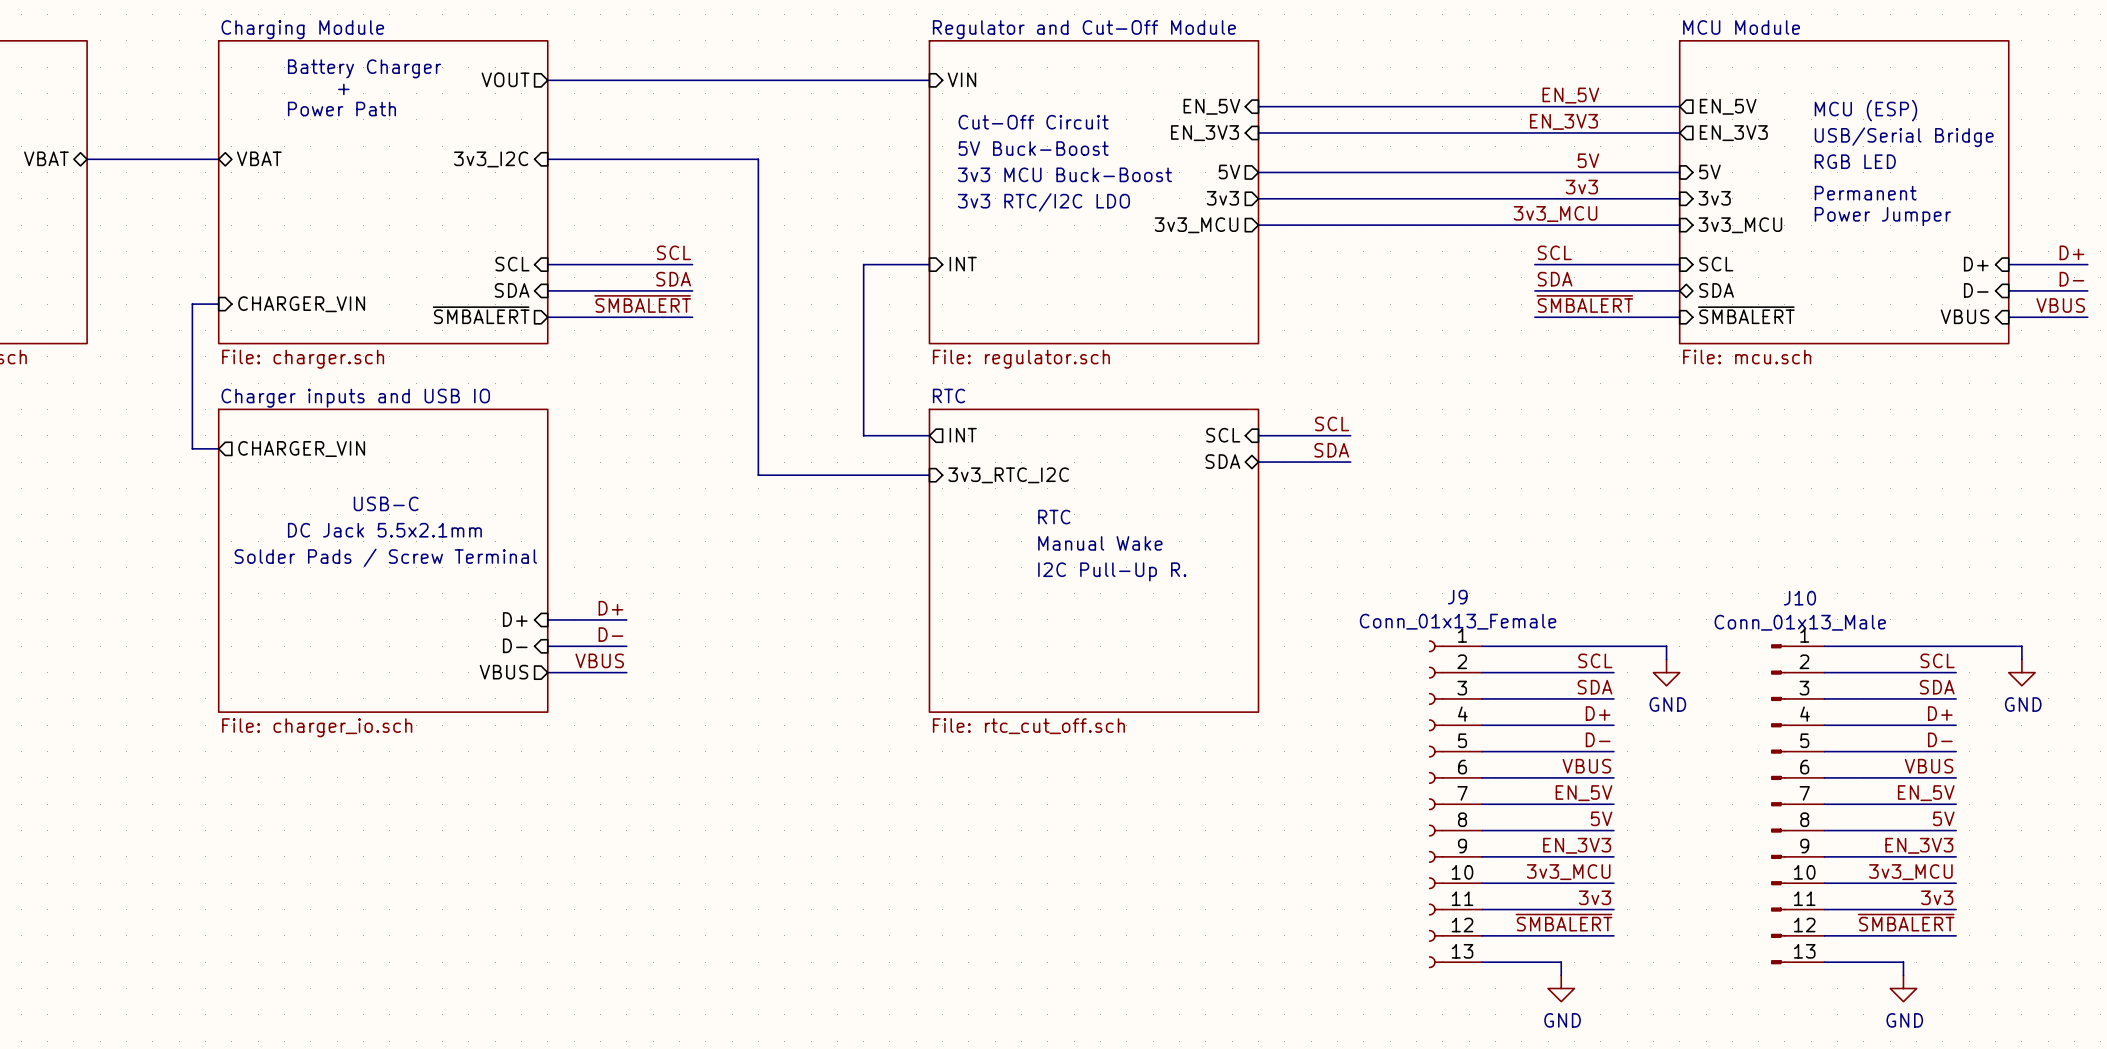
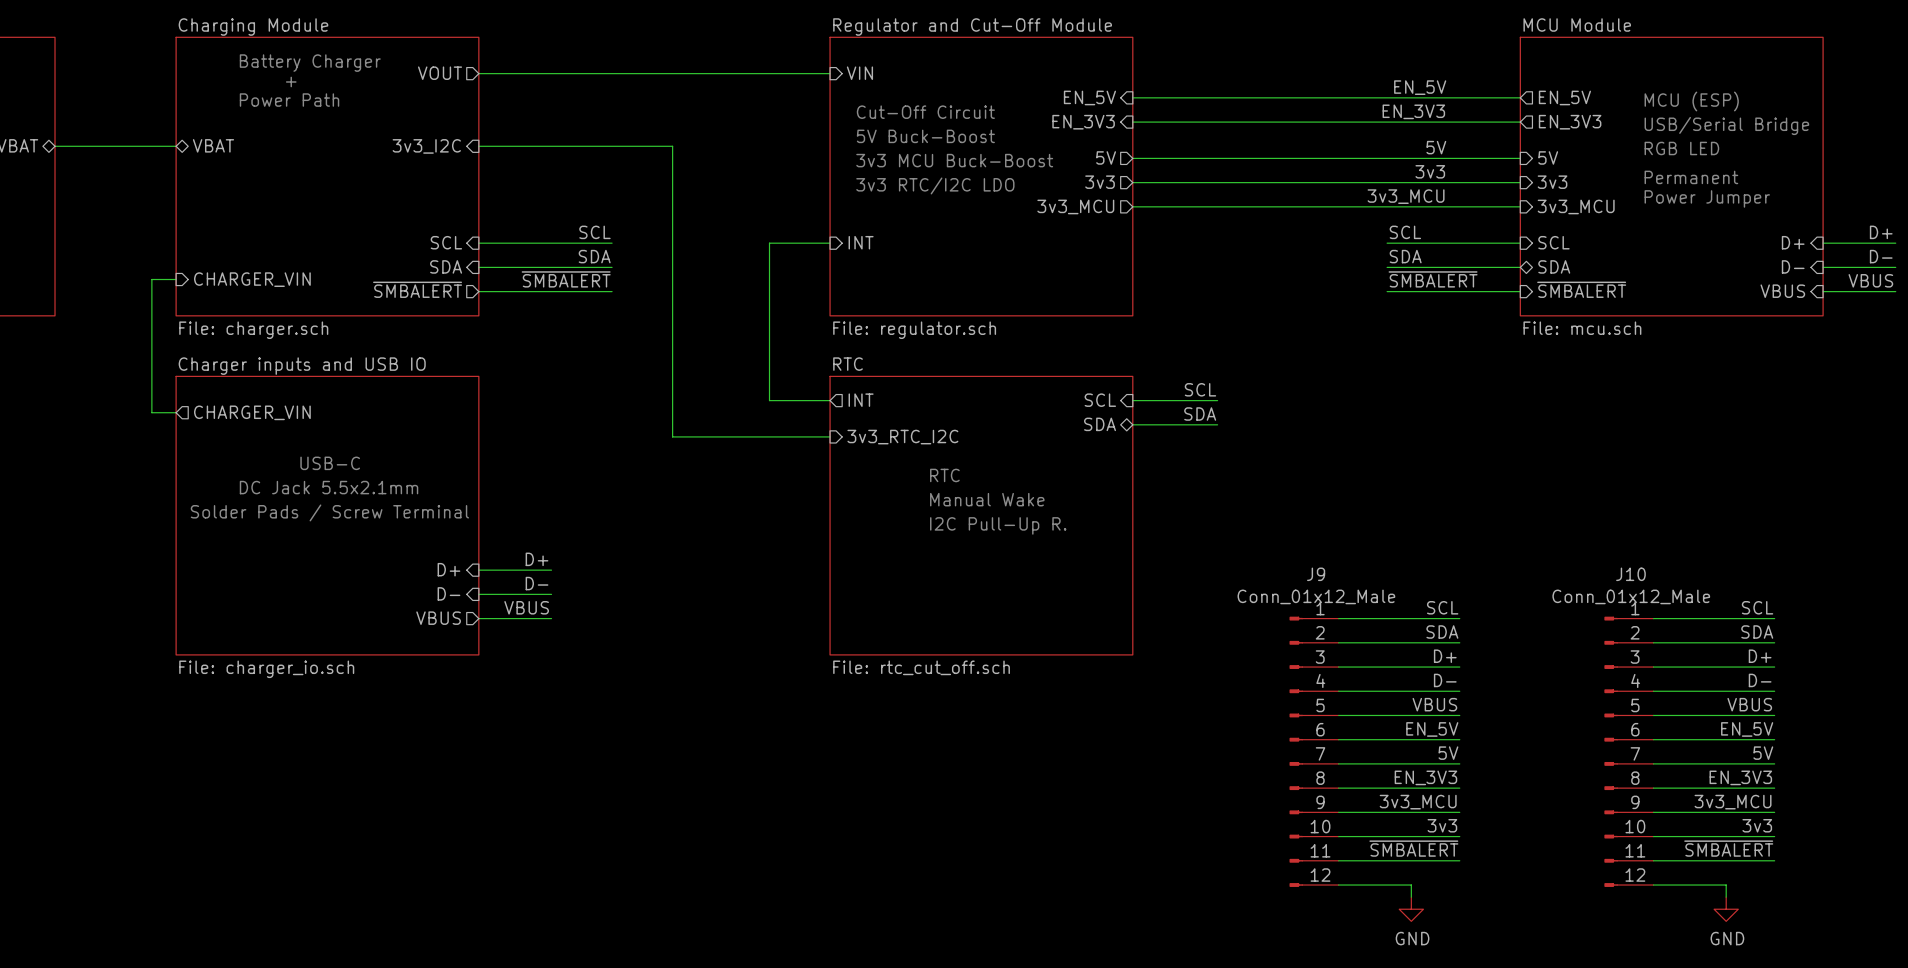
J9 value: Conn_01x13_Female (1458, 621) -> Conn_01x12_Male (1316, 596)
J10 value: Conn_01x13_Male (1800, 622) -> Conn_01x12_Male (1631, 596)
J9 symbol: [1428, 640, 1483, 969] -> [1289, 616, 1339, 887]
J10 symbol: [1771, 644, 1825, 965] -> [1604, 616, 1654, 887]
wire: (1482, 646) (1666, 646) (1666, 659) -> none
wire: (1824, 646) (2021, 646) (2021, 659) -> none
power symbol: GND (1666, 672) -> none
power symbol: GND (2021, 672) -> none

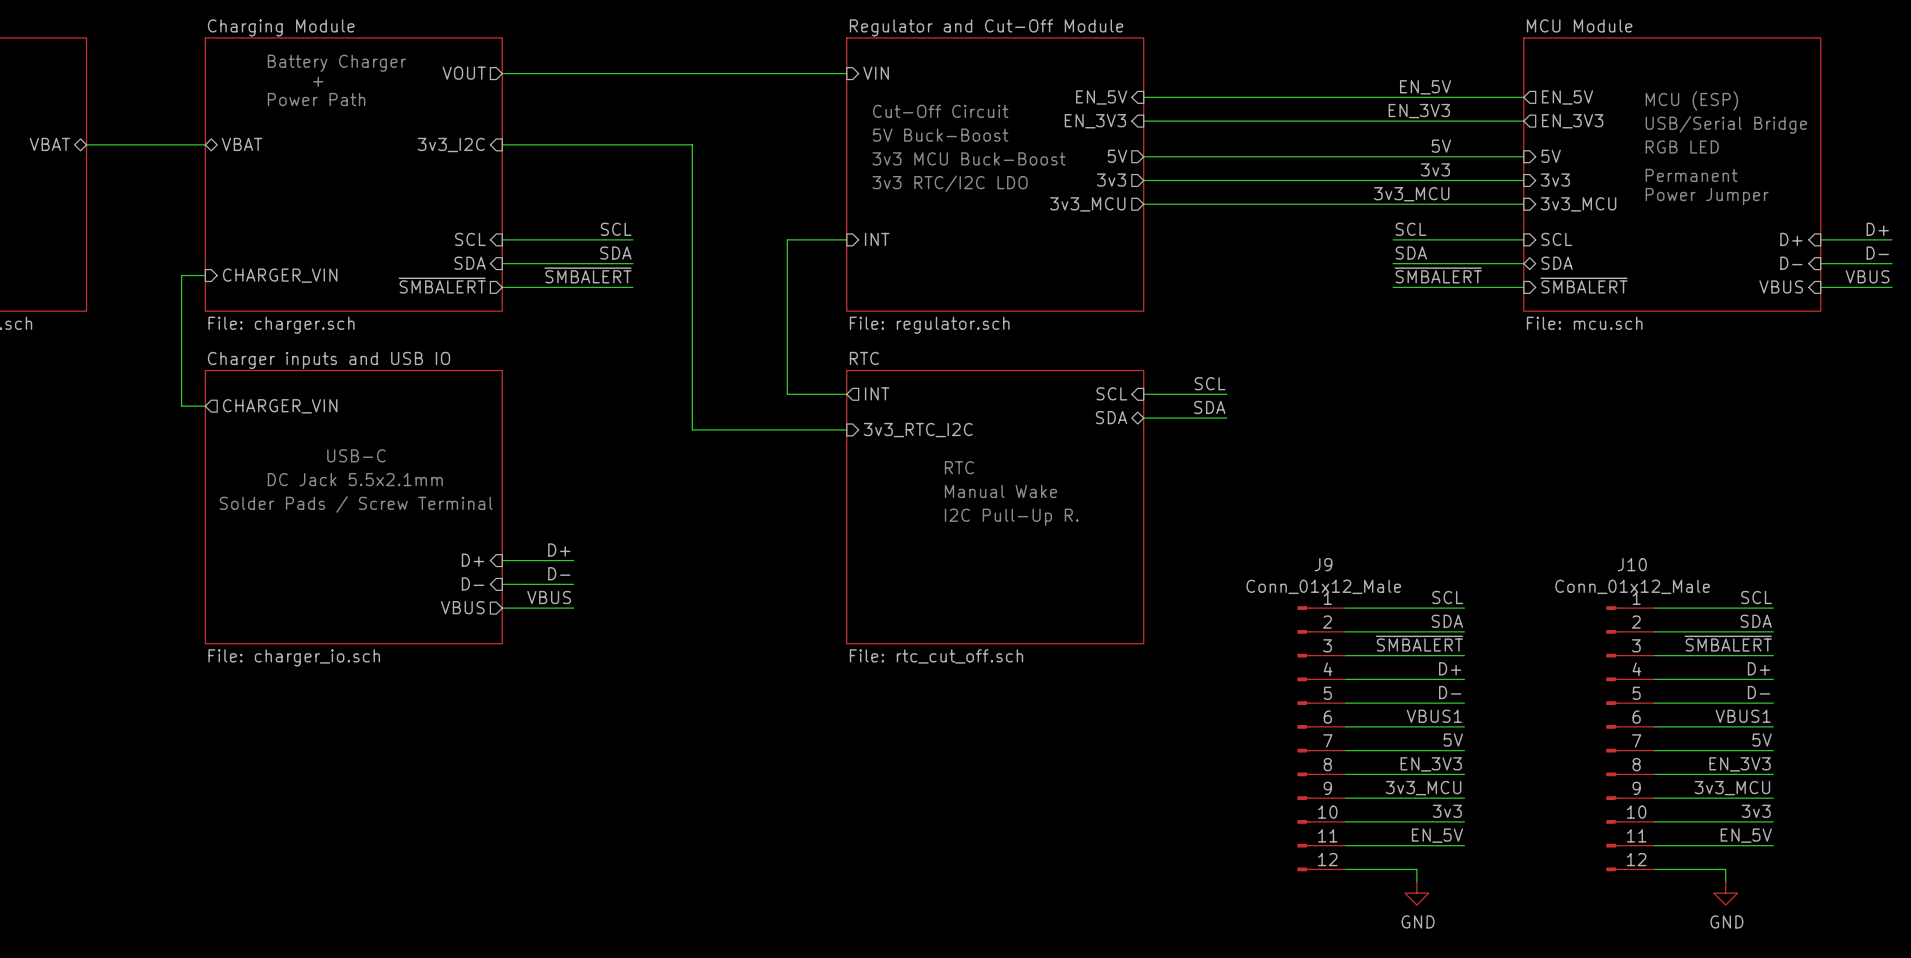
label: D+ (1445, 656) -> ~{SMBALERT} (1419, 643)
label: D+ (1760, 656) -> ~{SMBALERT} (1728, 643)
label: D- (1445, 680) -> D+ (1450, 668)
label: D- (1760, 680) -> D+ (1759, 668)
label: VBUS (1434, 704) -> D- (1450, 692)
label: VBUS (1749, 704) -> D- (1759, 692)
label: EN_5V (1432, 729) -> VBUS1 (1434, 716)
label: EN_5V (1747, 729) -> VBUS1 (1743, 716)
label: ~{SMBALERT} (1413, 848) -> EN_5V (1437, 835)
label: ~{SMBALERT} (1728, 848) -> EN_5V (1746, 835)

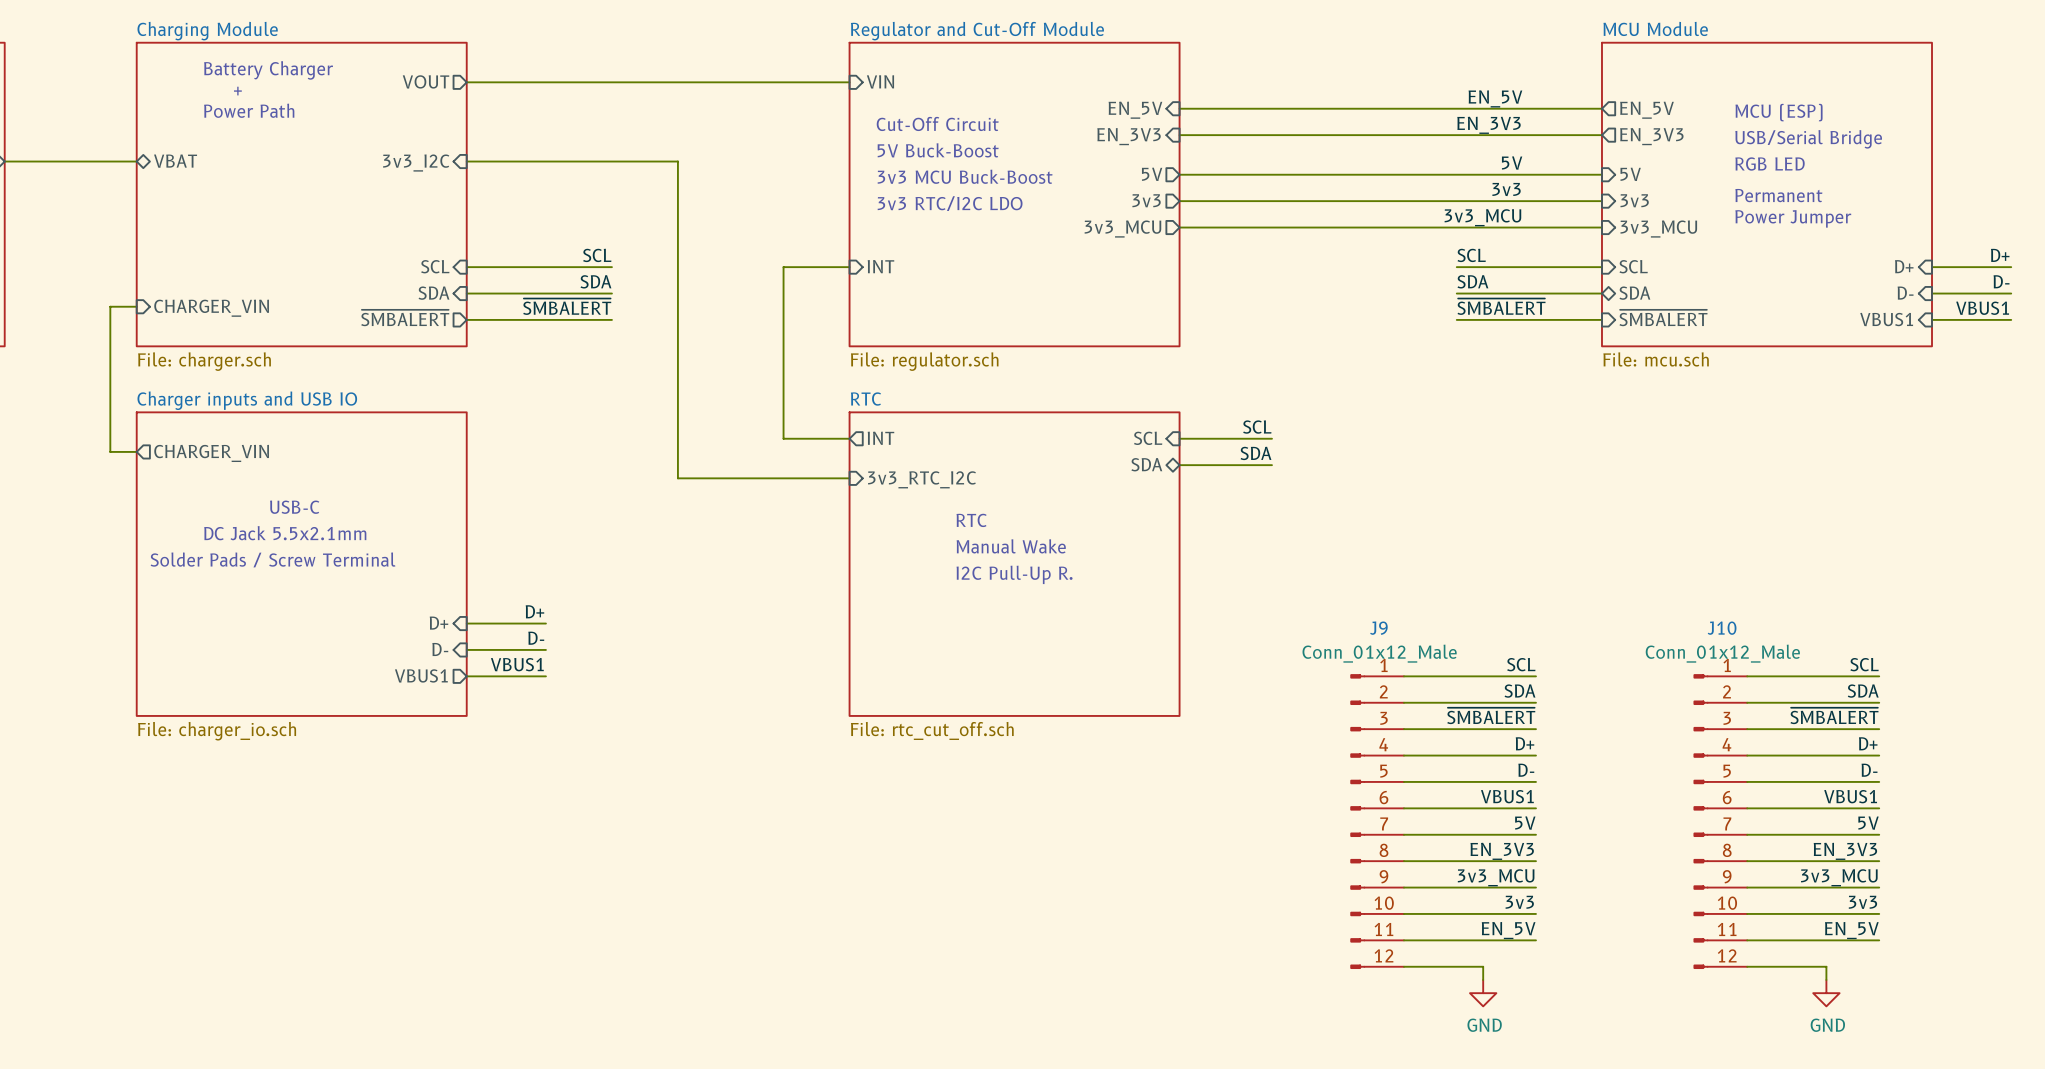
label: VBUS (1867, 276) -> VBUS1 (1982, 308)
sheet pin: VBUS (1781, 286) -> VBUS1 (1886, 319)
label: VBUS (549, 597) -> VBUS1 (517, 664)
sheet pin: VBUS (462, 607) -> VBUS1 (421, 675)

